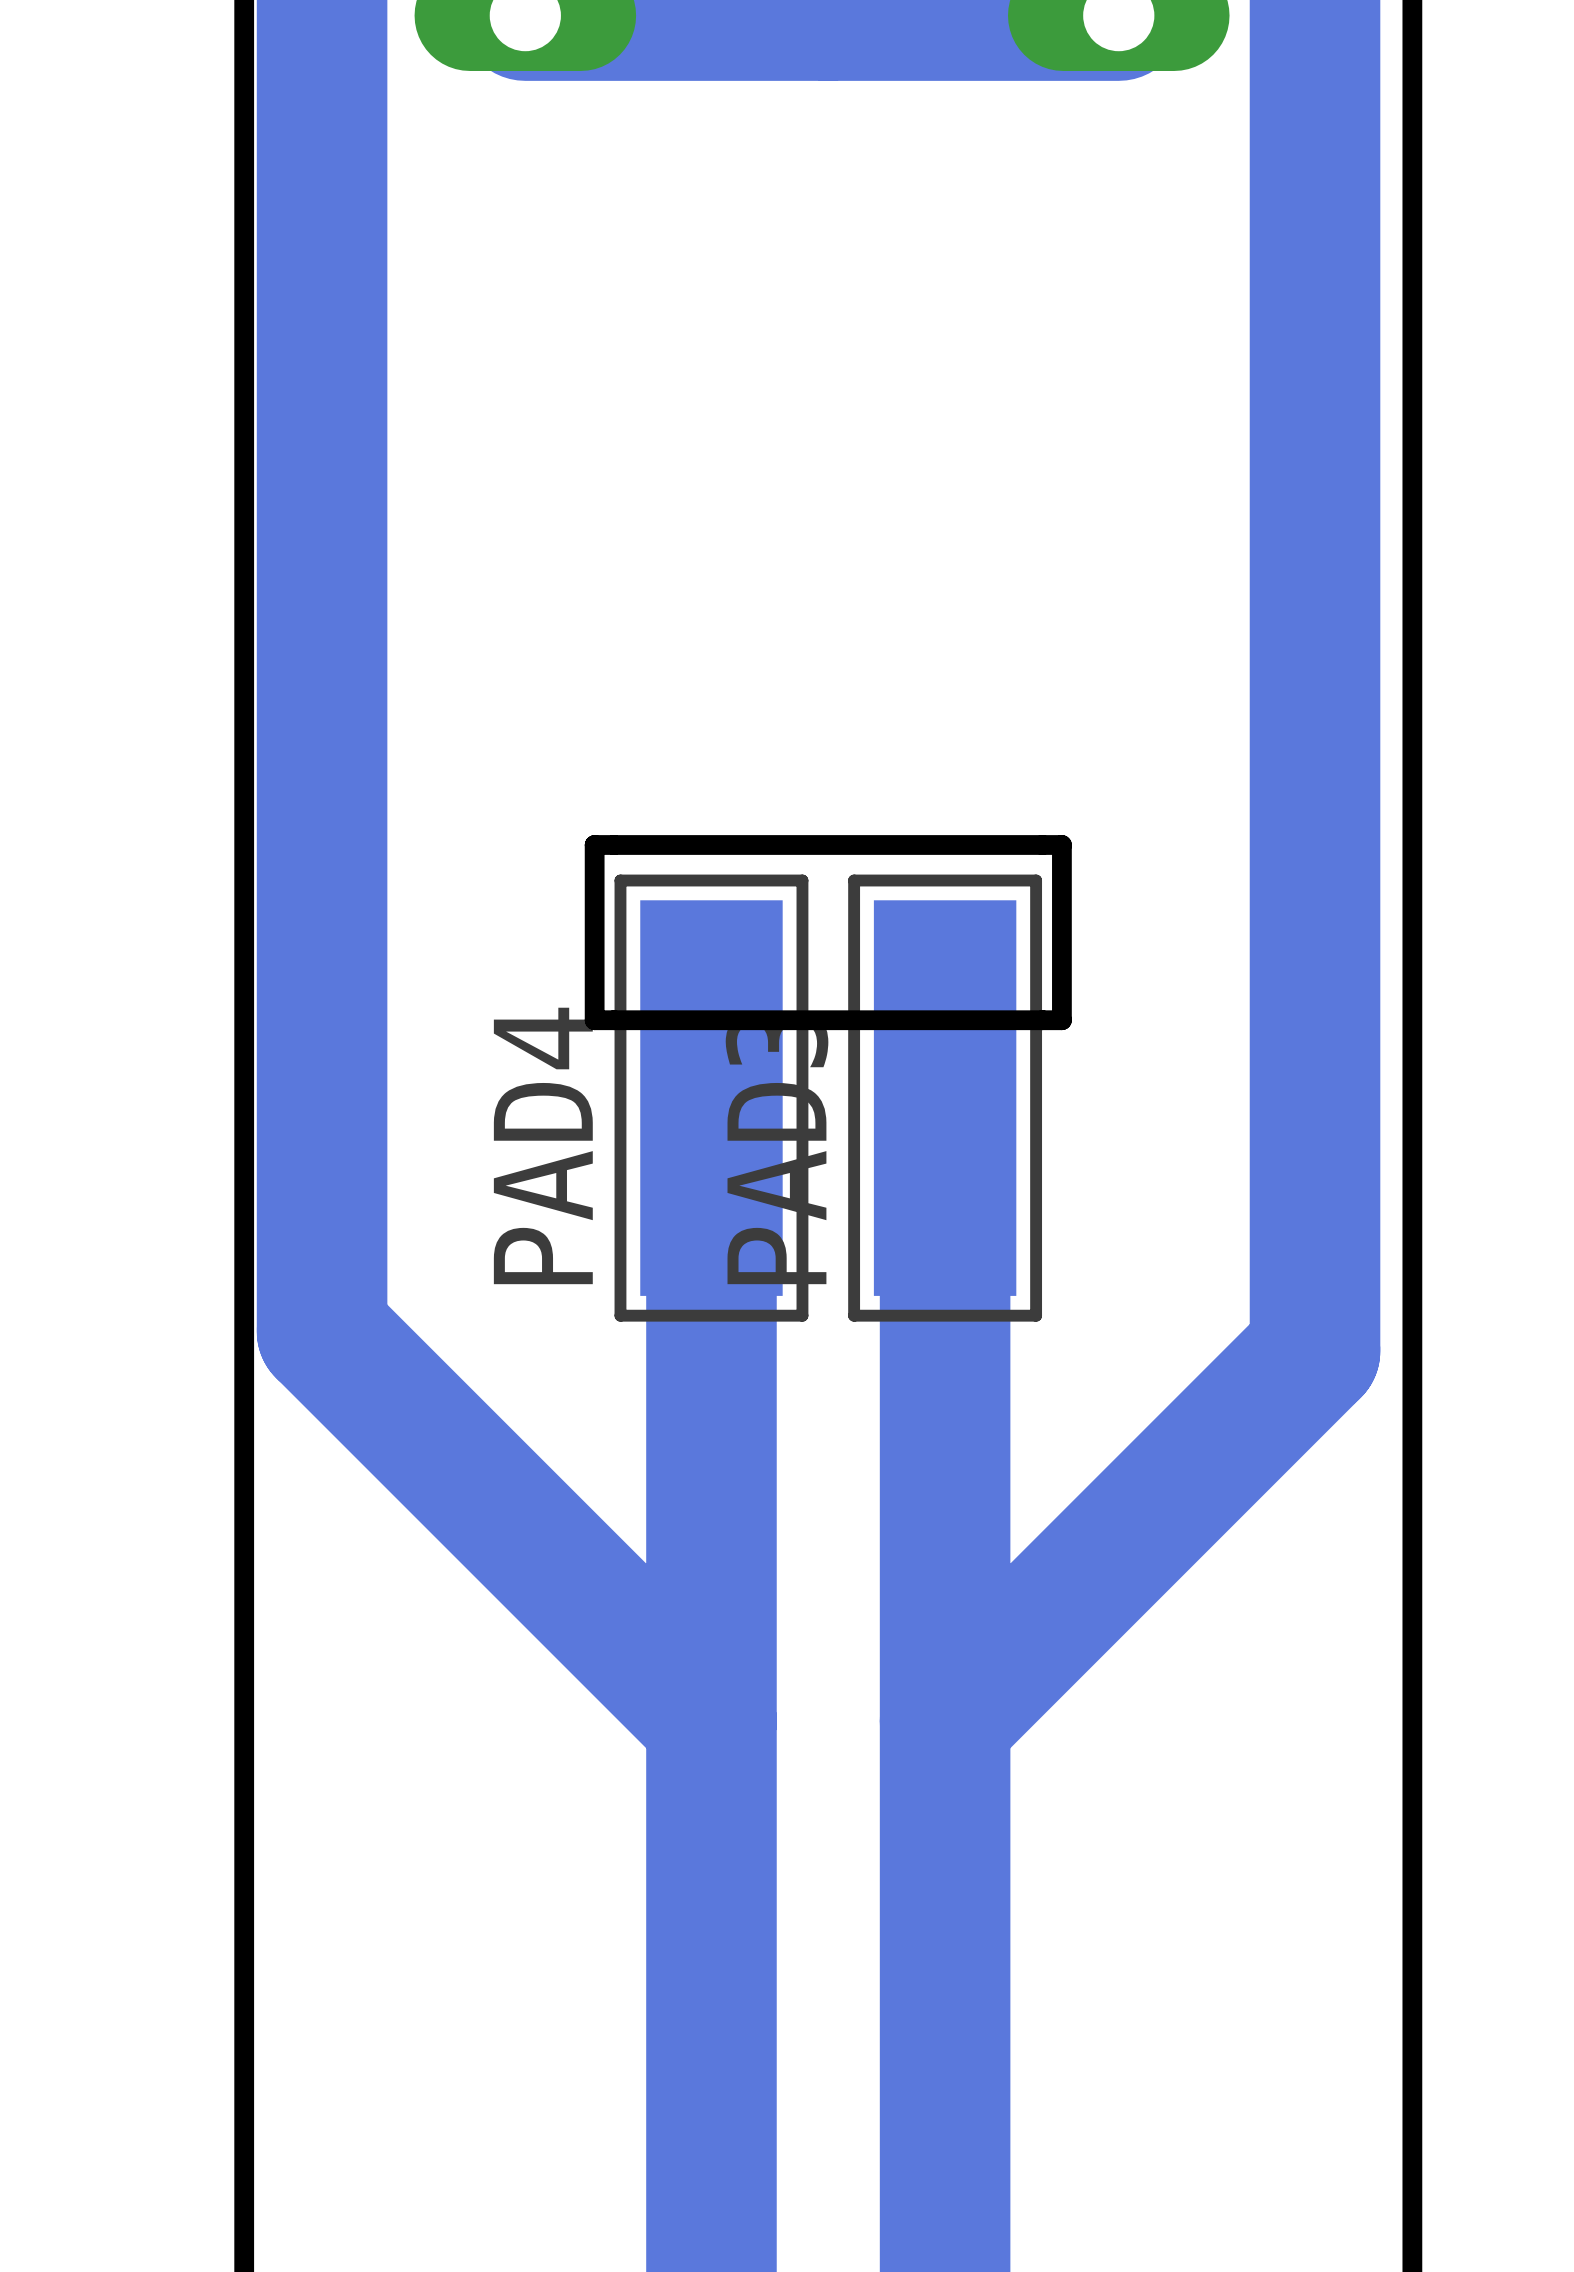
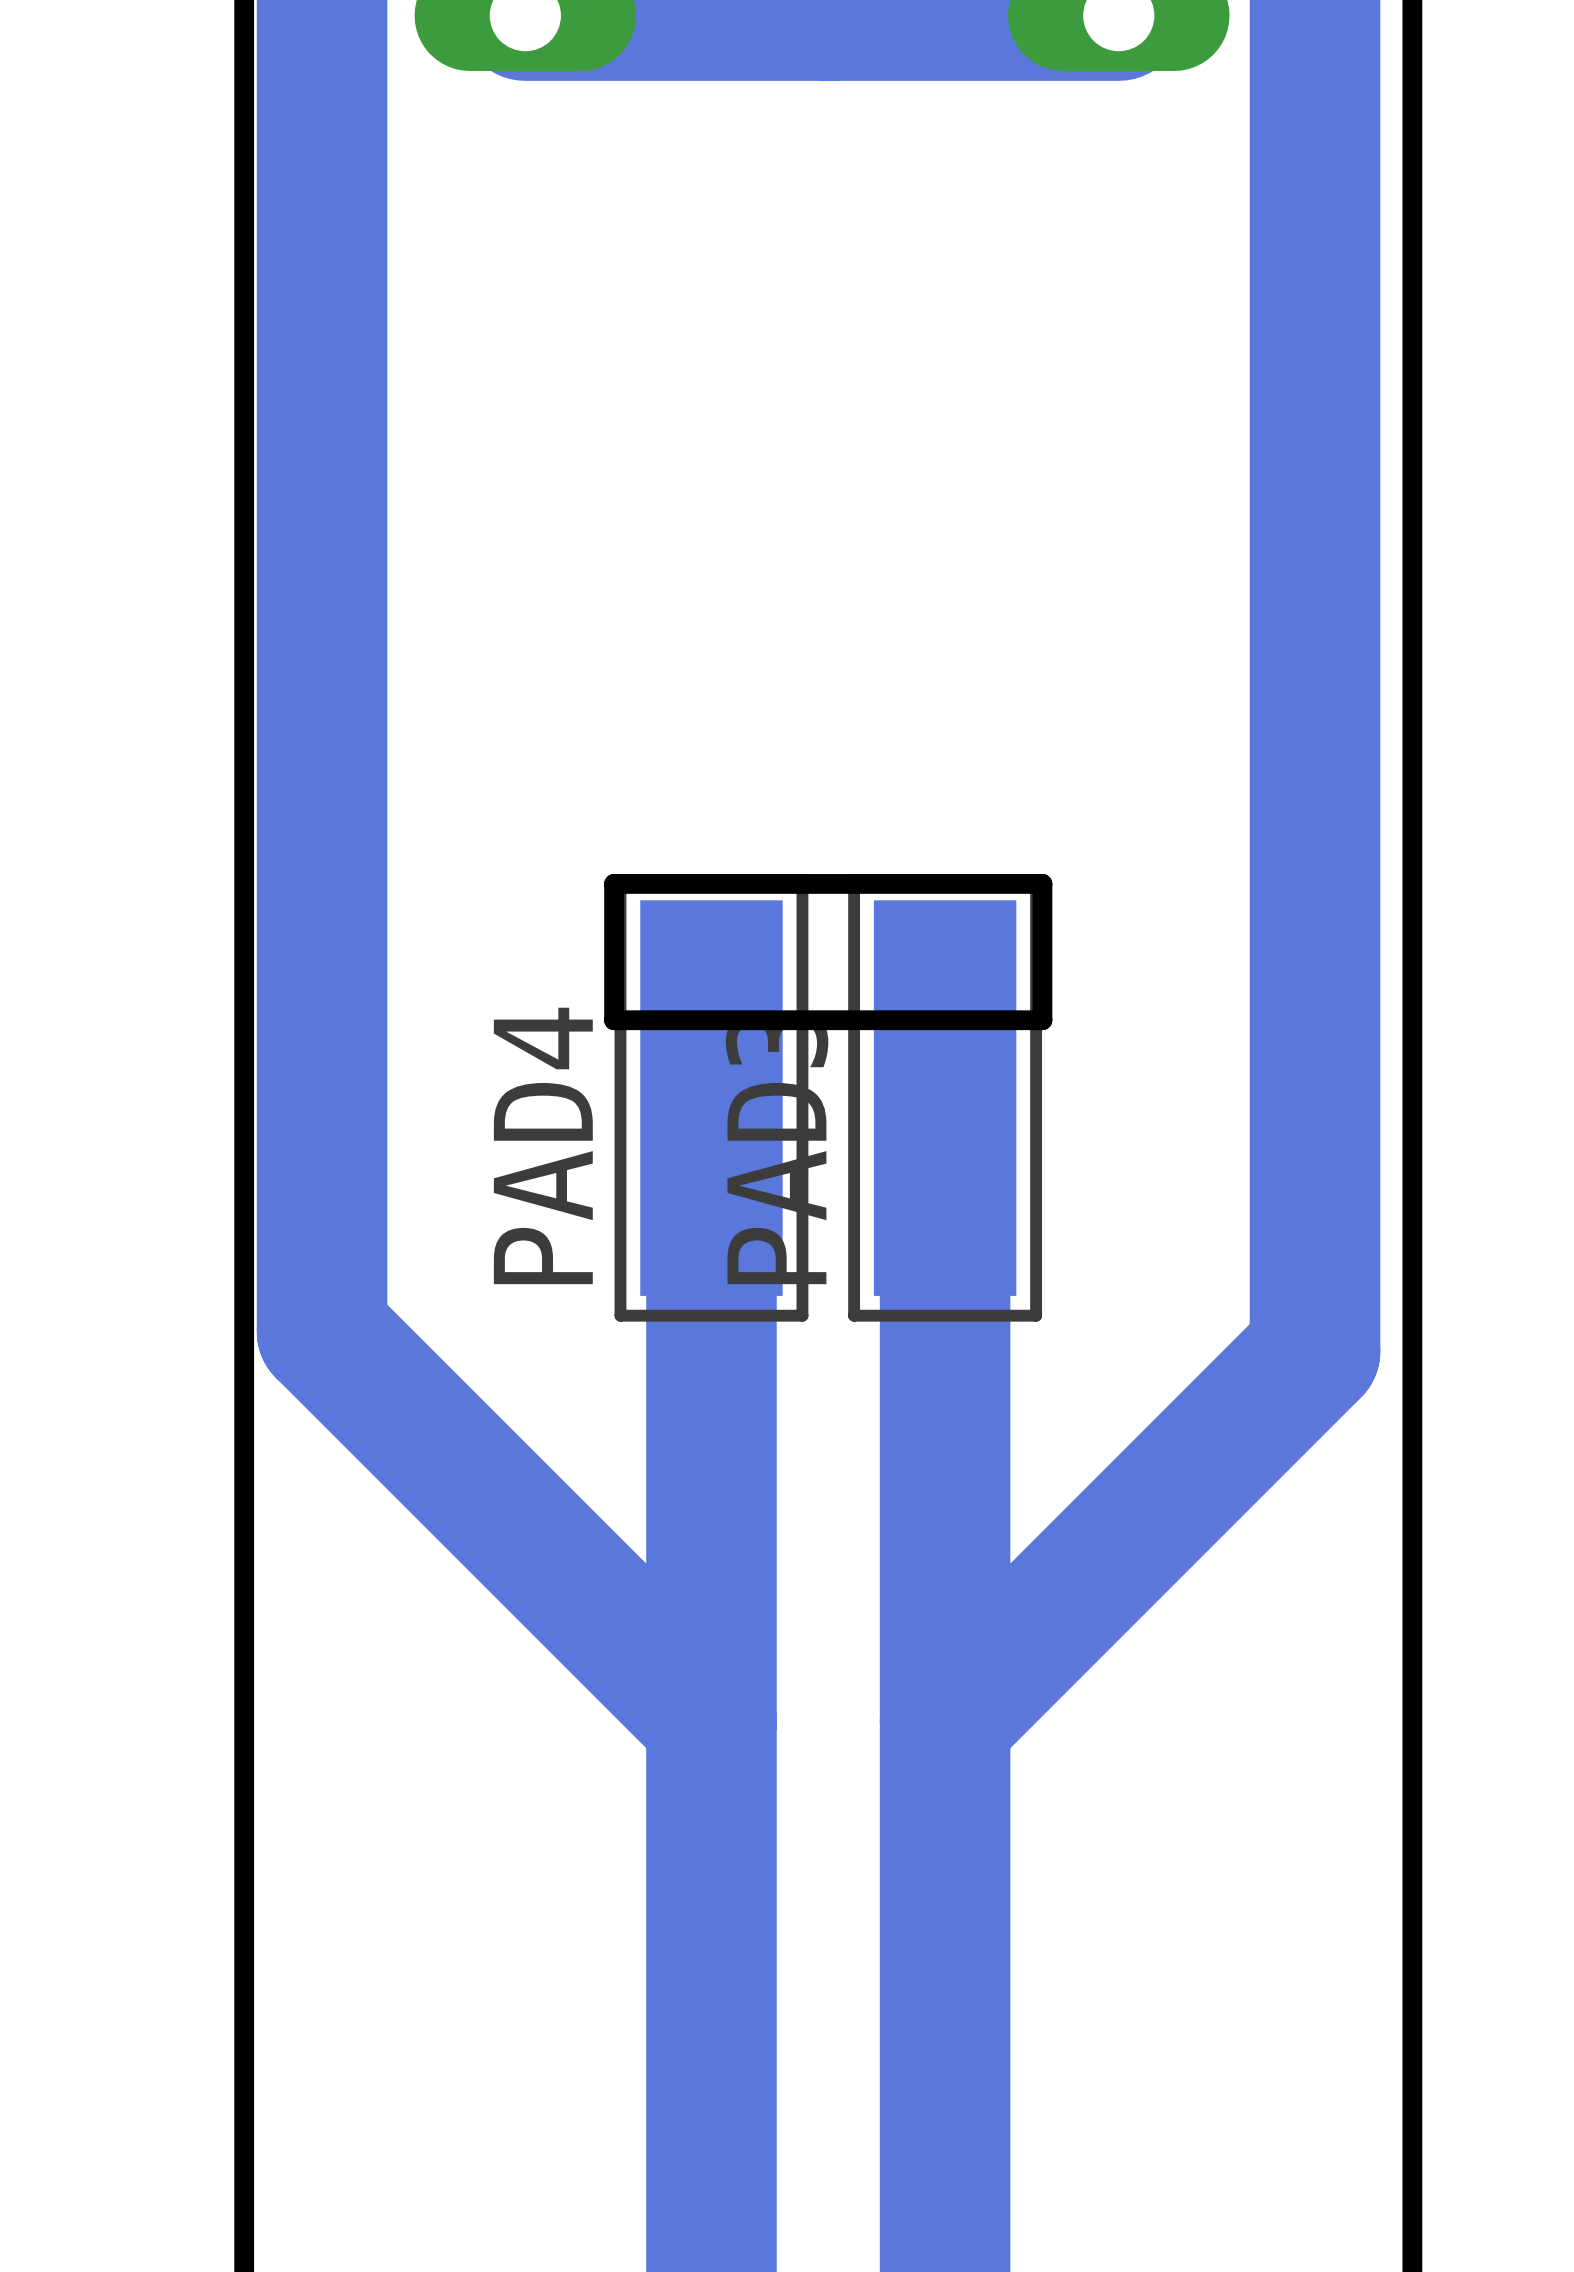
board edge: (1042, 1020) (1061, 1020) (1061, 845) (594, 845) (594, 1020) (614, 1020) -> (1042, 1020) (1042, 883) (614, 883) (614, 1020)

